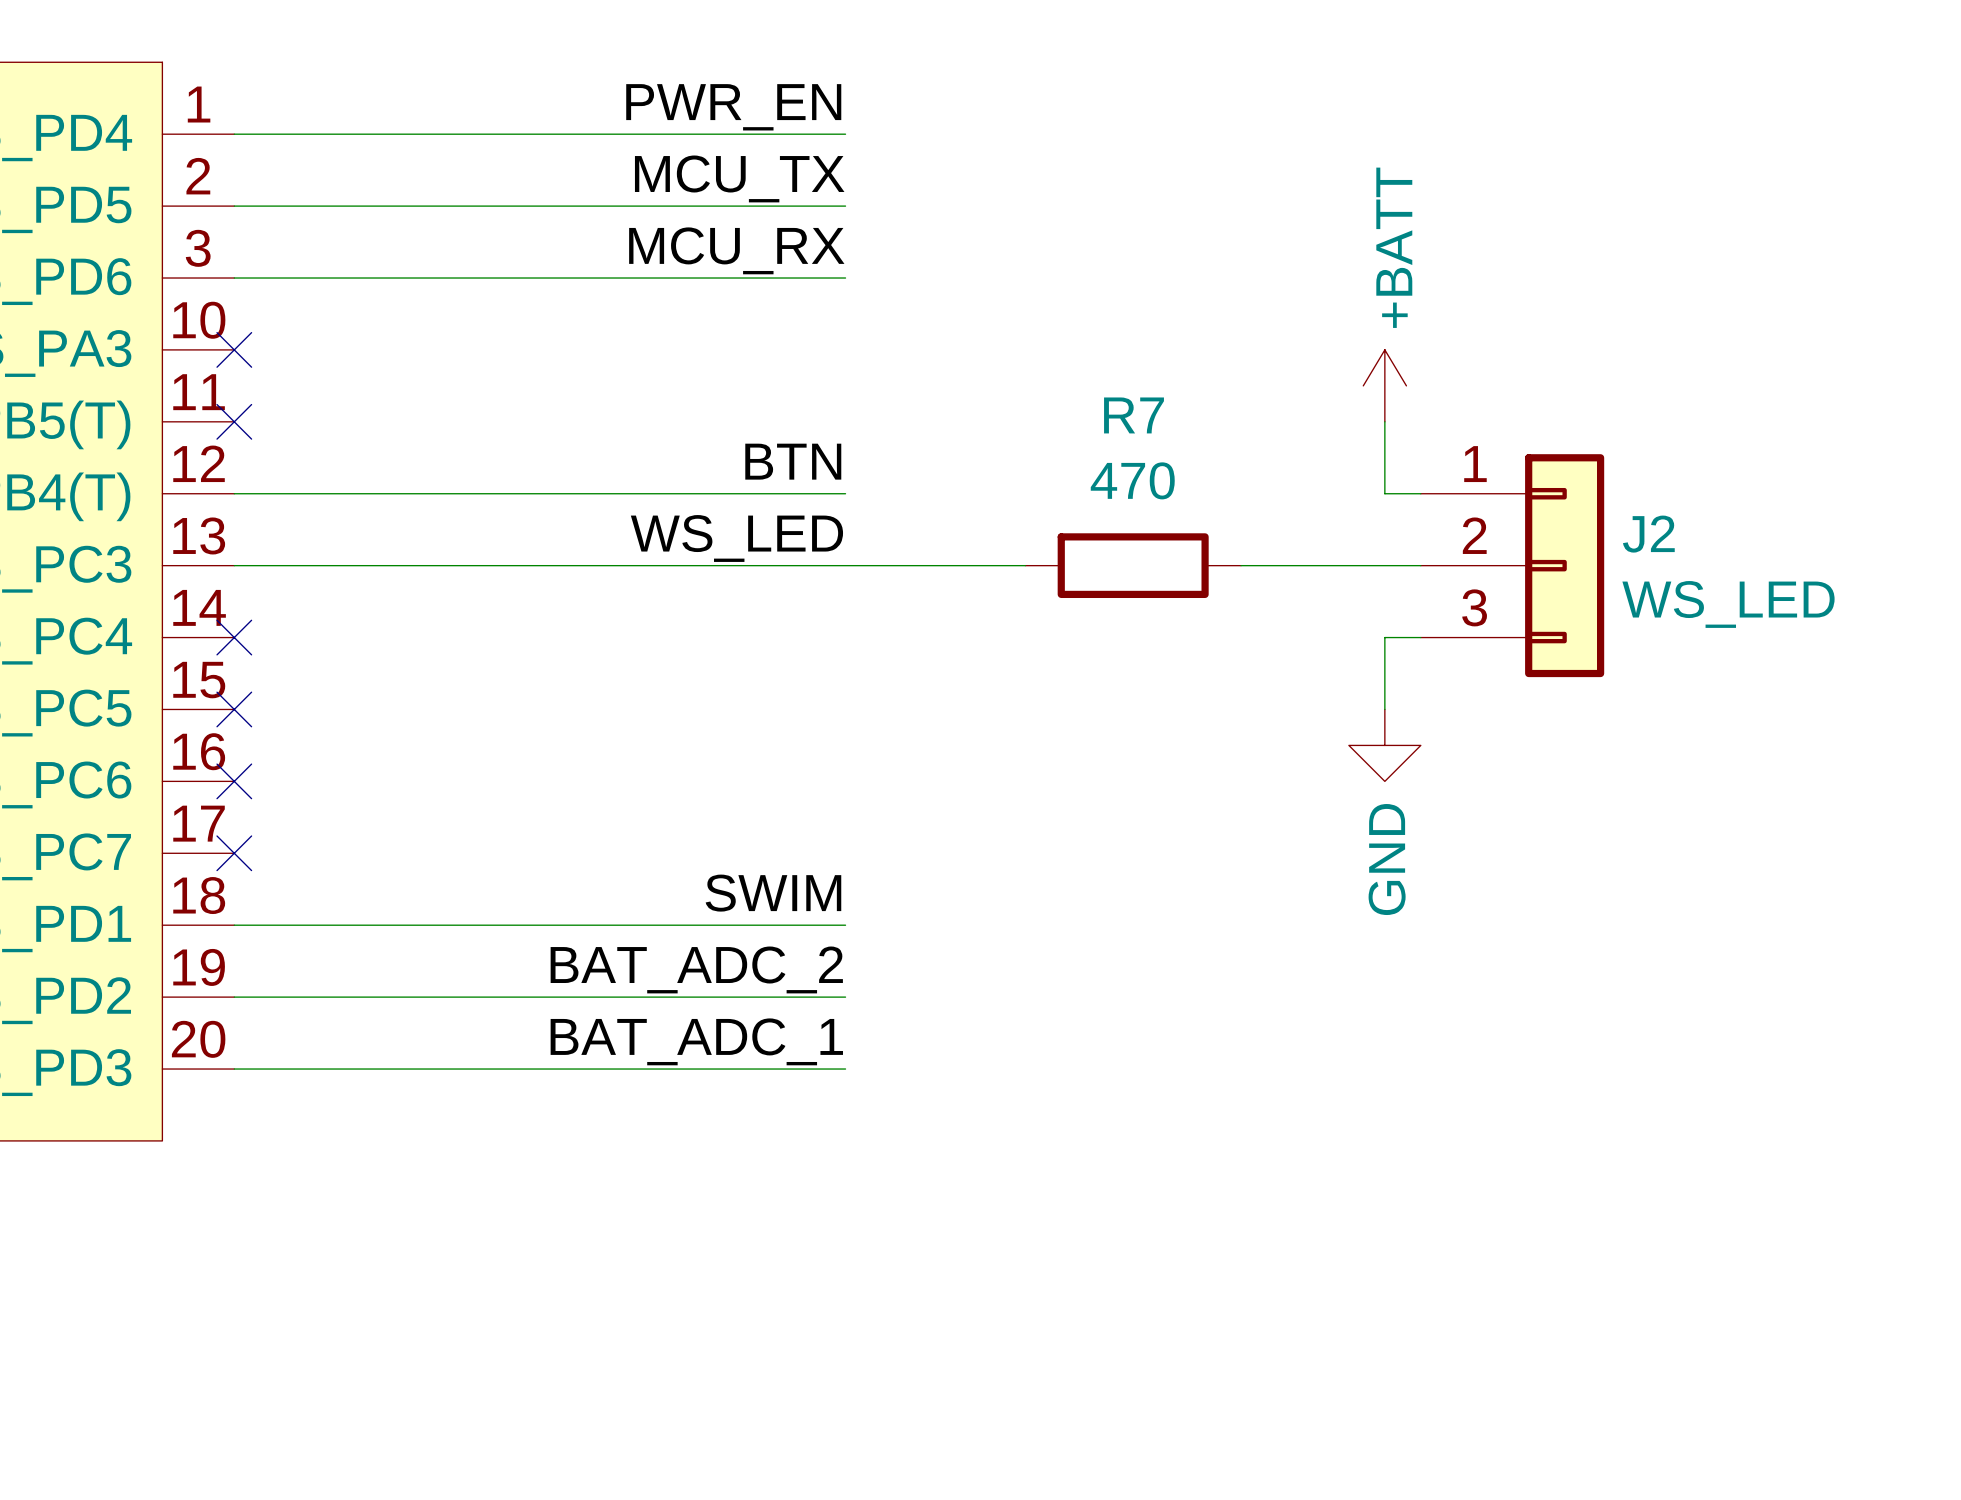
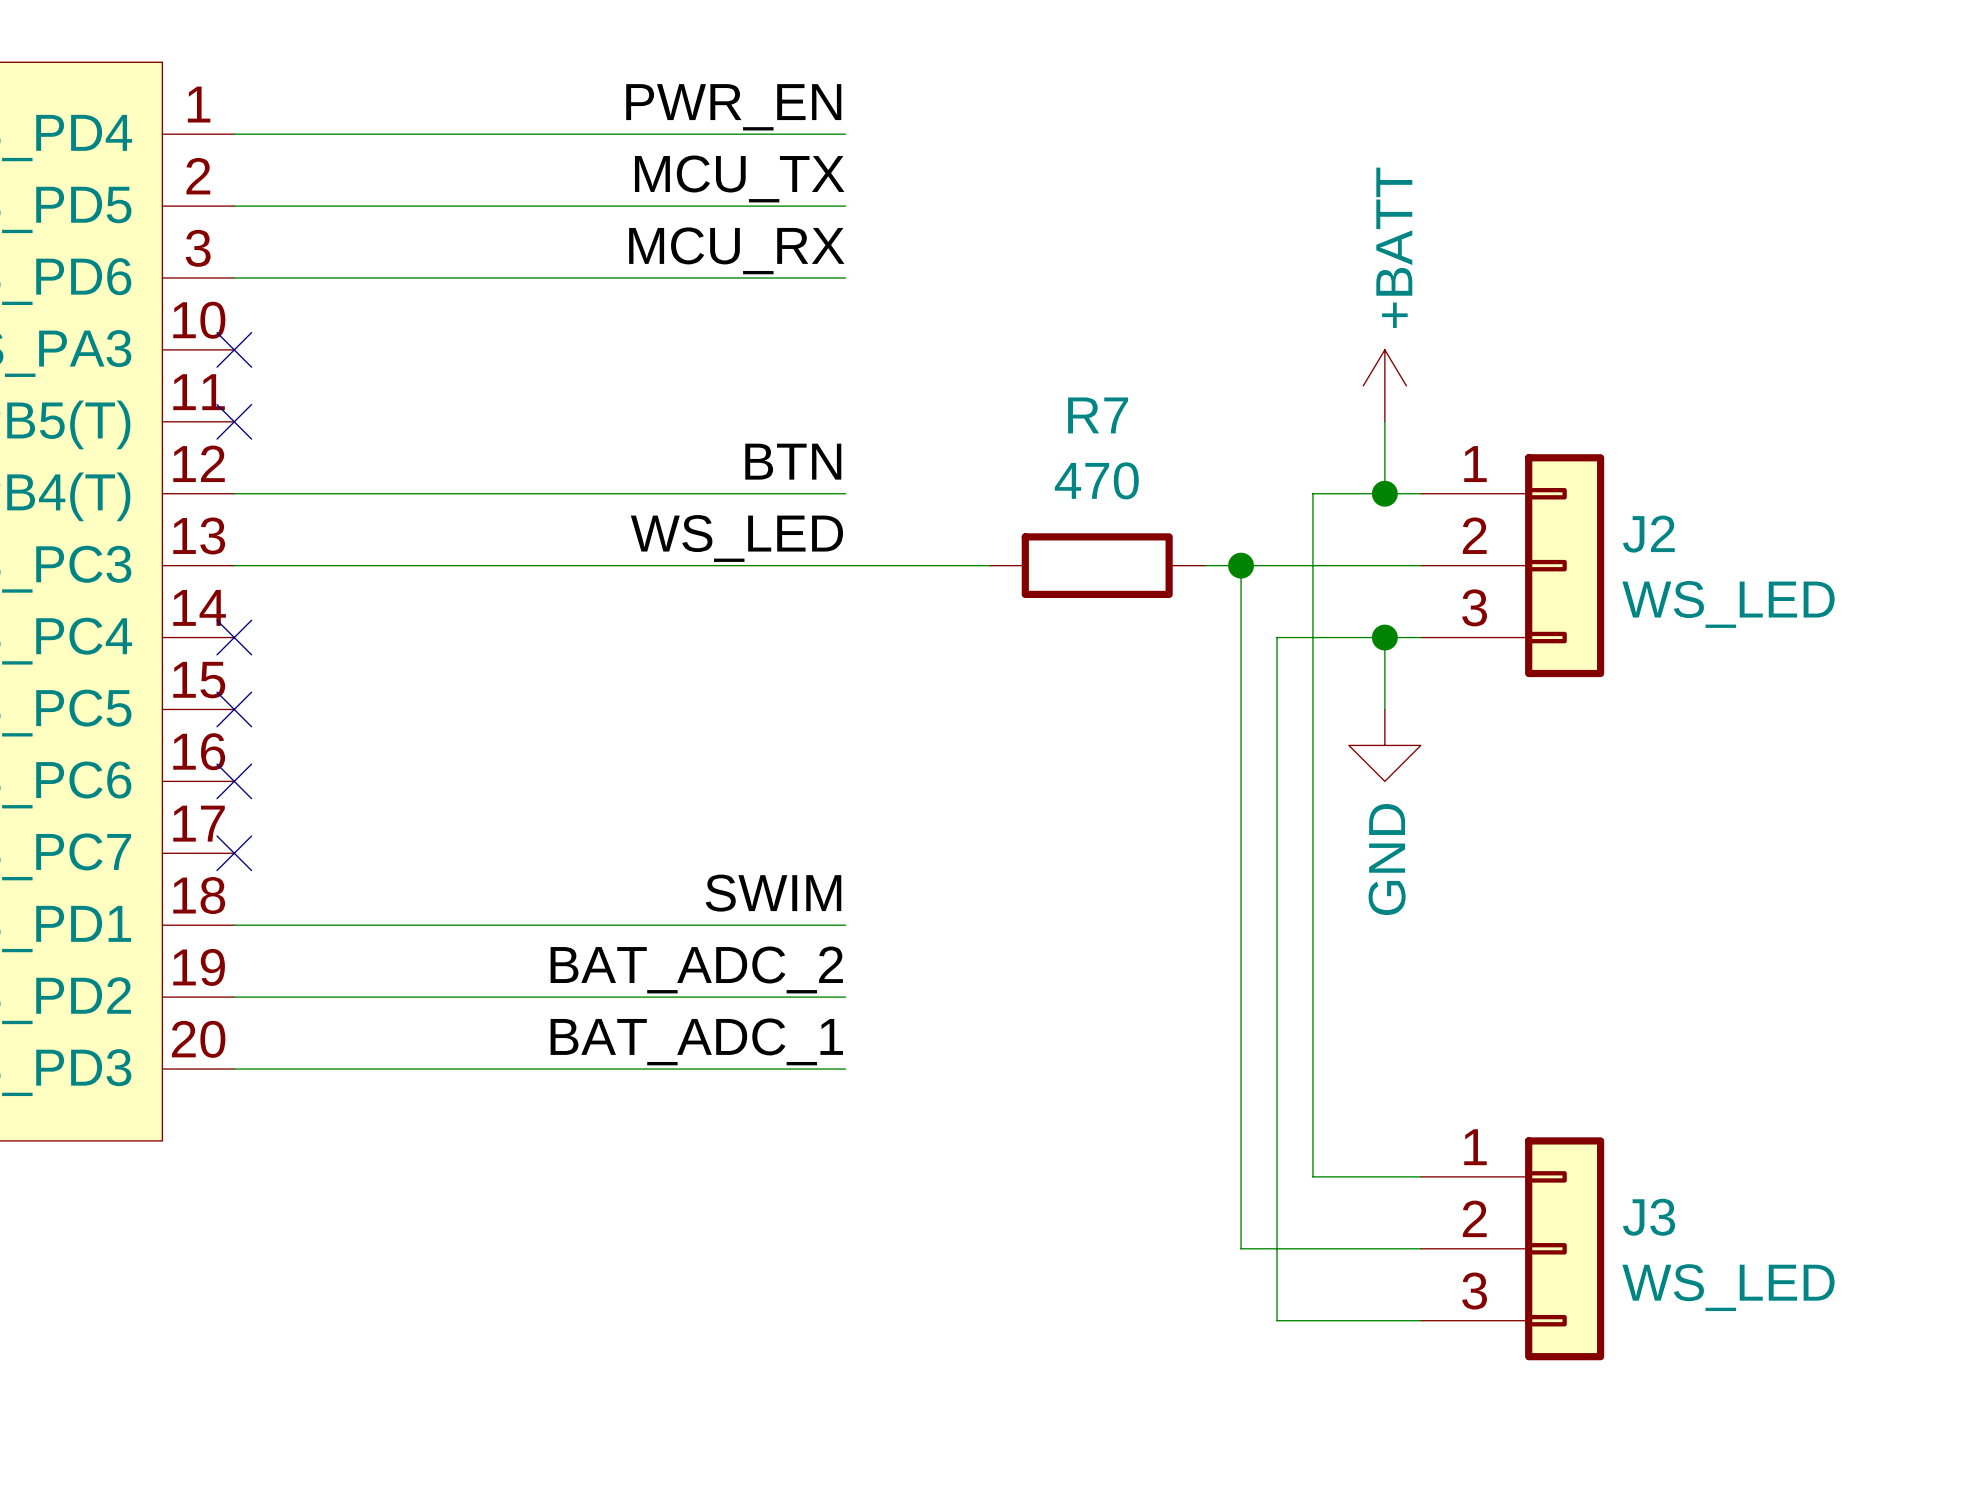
wire: none -> (1384, 493) (1312, 493) (1312, 1176) (1420, 1176)
junction: none -> (1384, 493)
R7 position: (1133, 565) -> (1097, 565)
wire: none -> (1205, 565) (1241, 565) (1241, 1248) (1420, 1248)
junction: none -> (1241, 565)
wire: none -> (1384, 637) (1276, 637) (1276, 1320) (1420, 1320)
junction: none -> (1384, 637)
J3: none -> WS_LED (1512, 1248)

